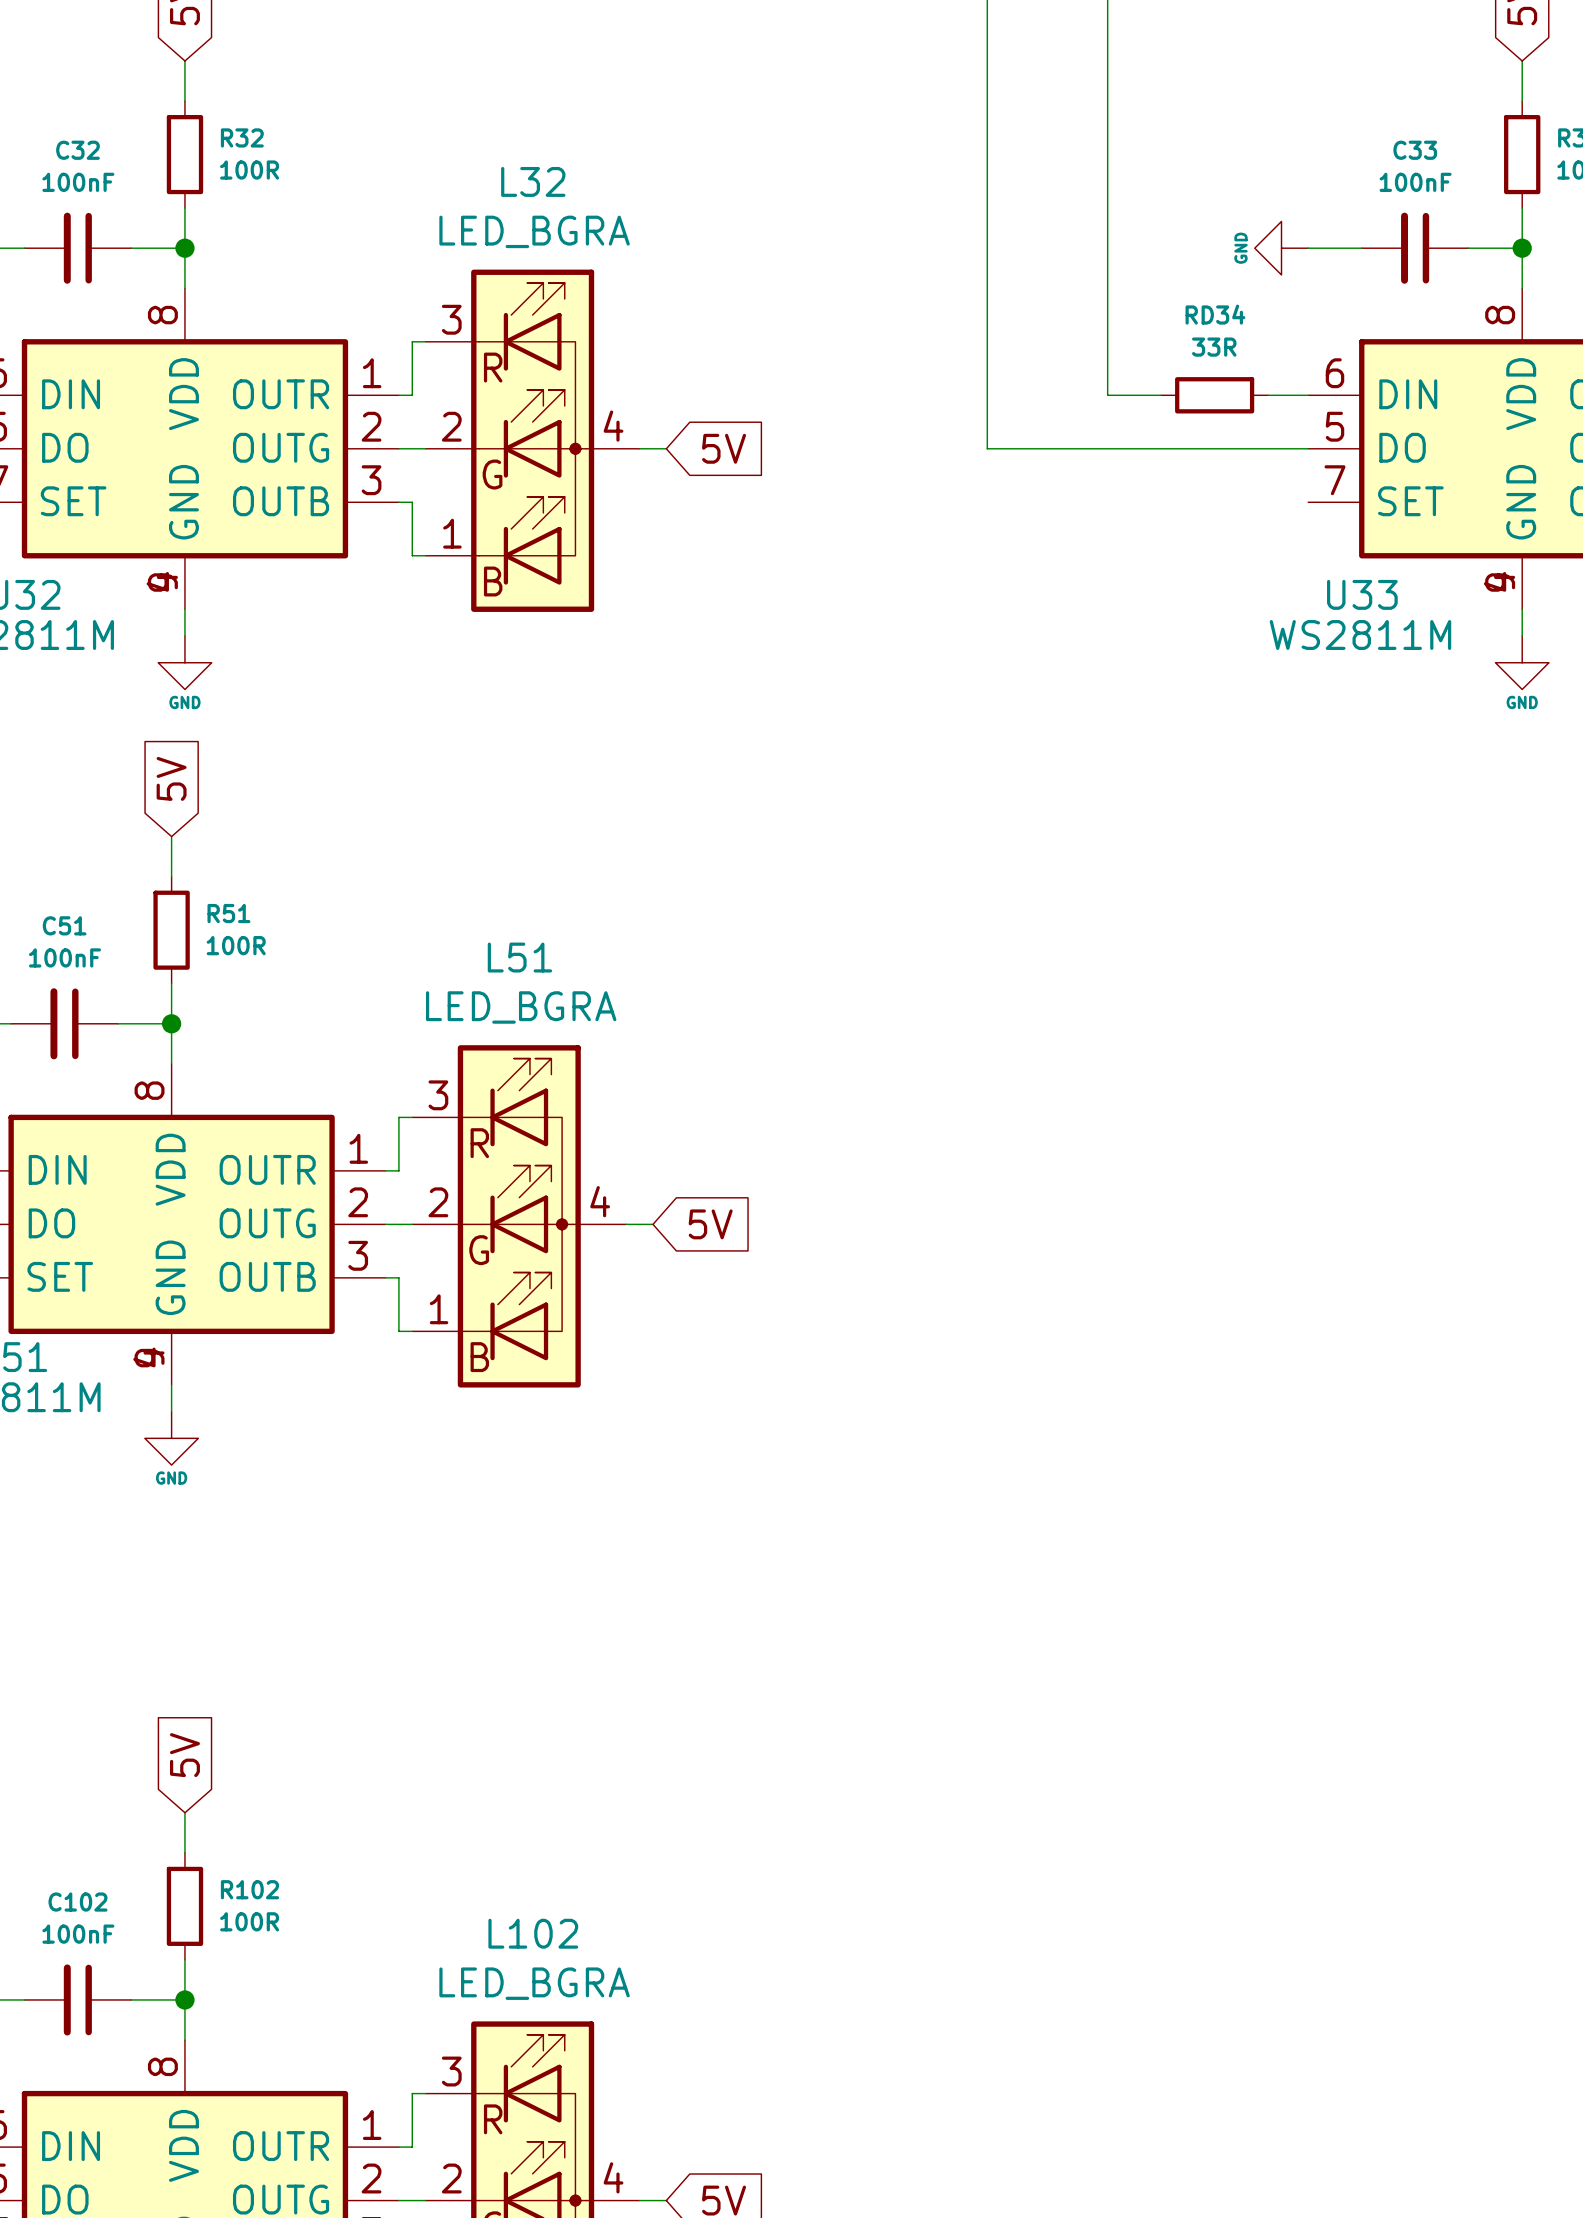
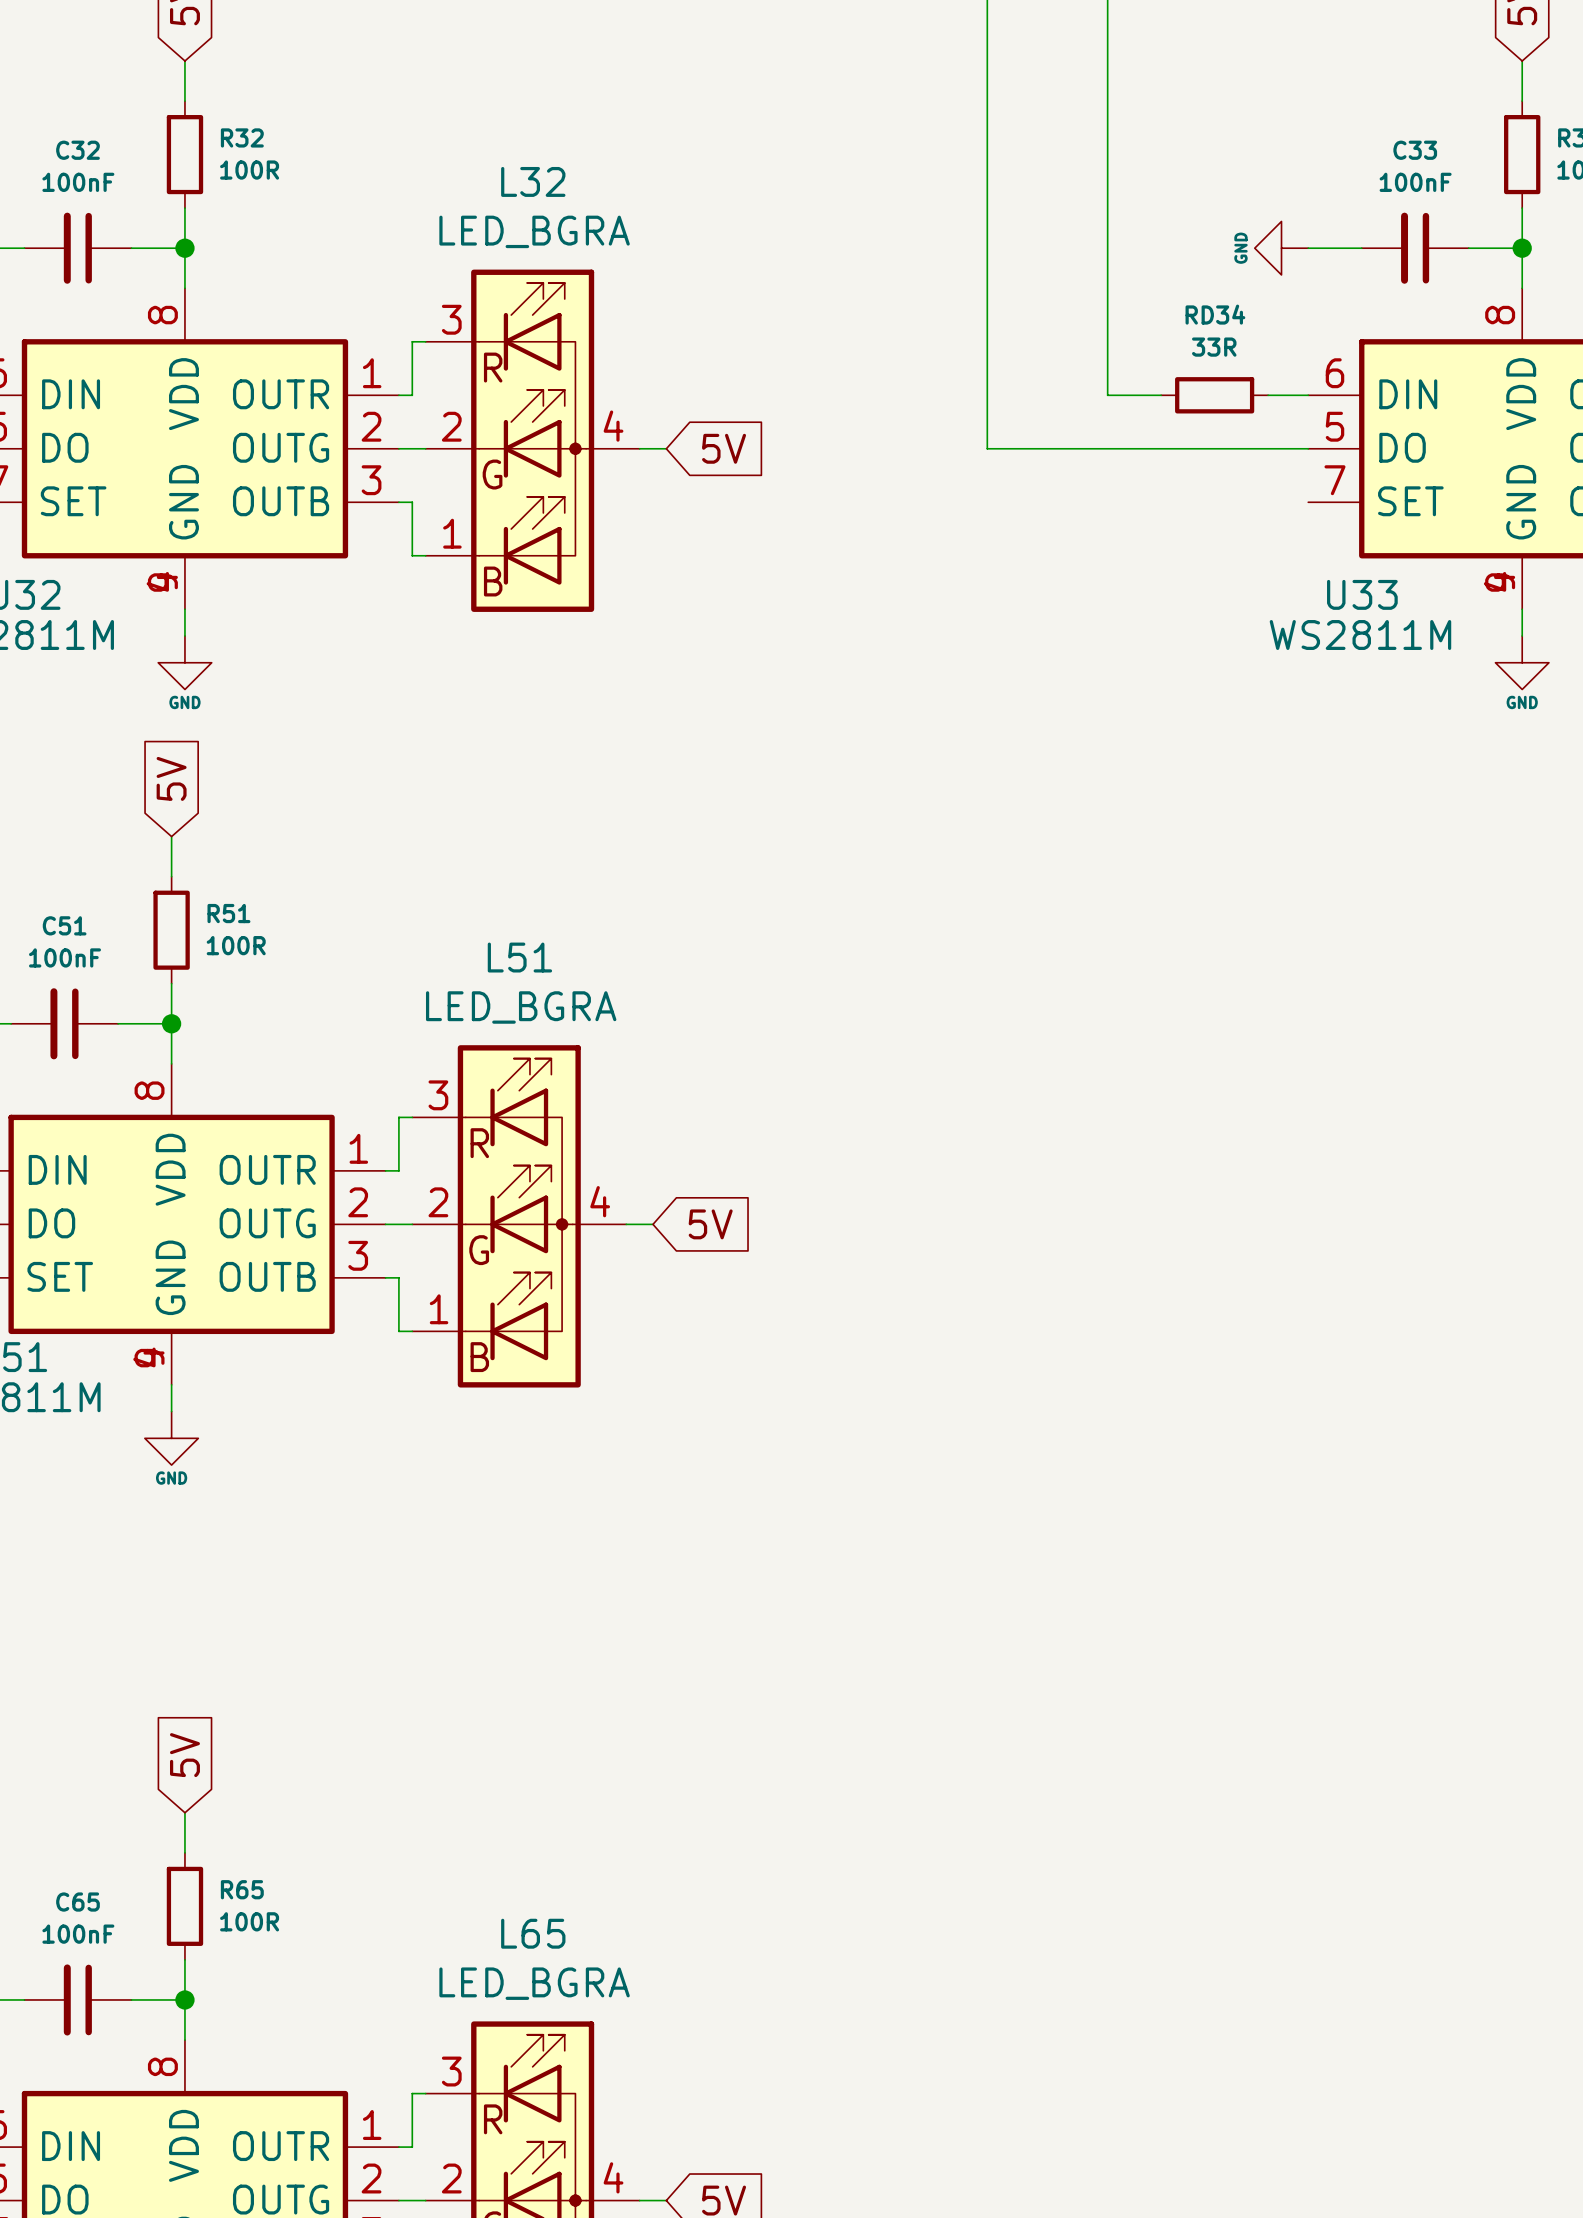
R102 name: R102 (249, 1889) -> R65 (242, 1889)
C102 name: C102 (77, 1902) -> C65 (77, 1902)
L102 name: L102 (533, 1933) -> L65 (533, 1933)

